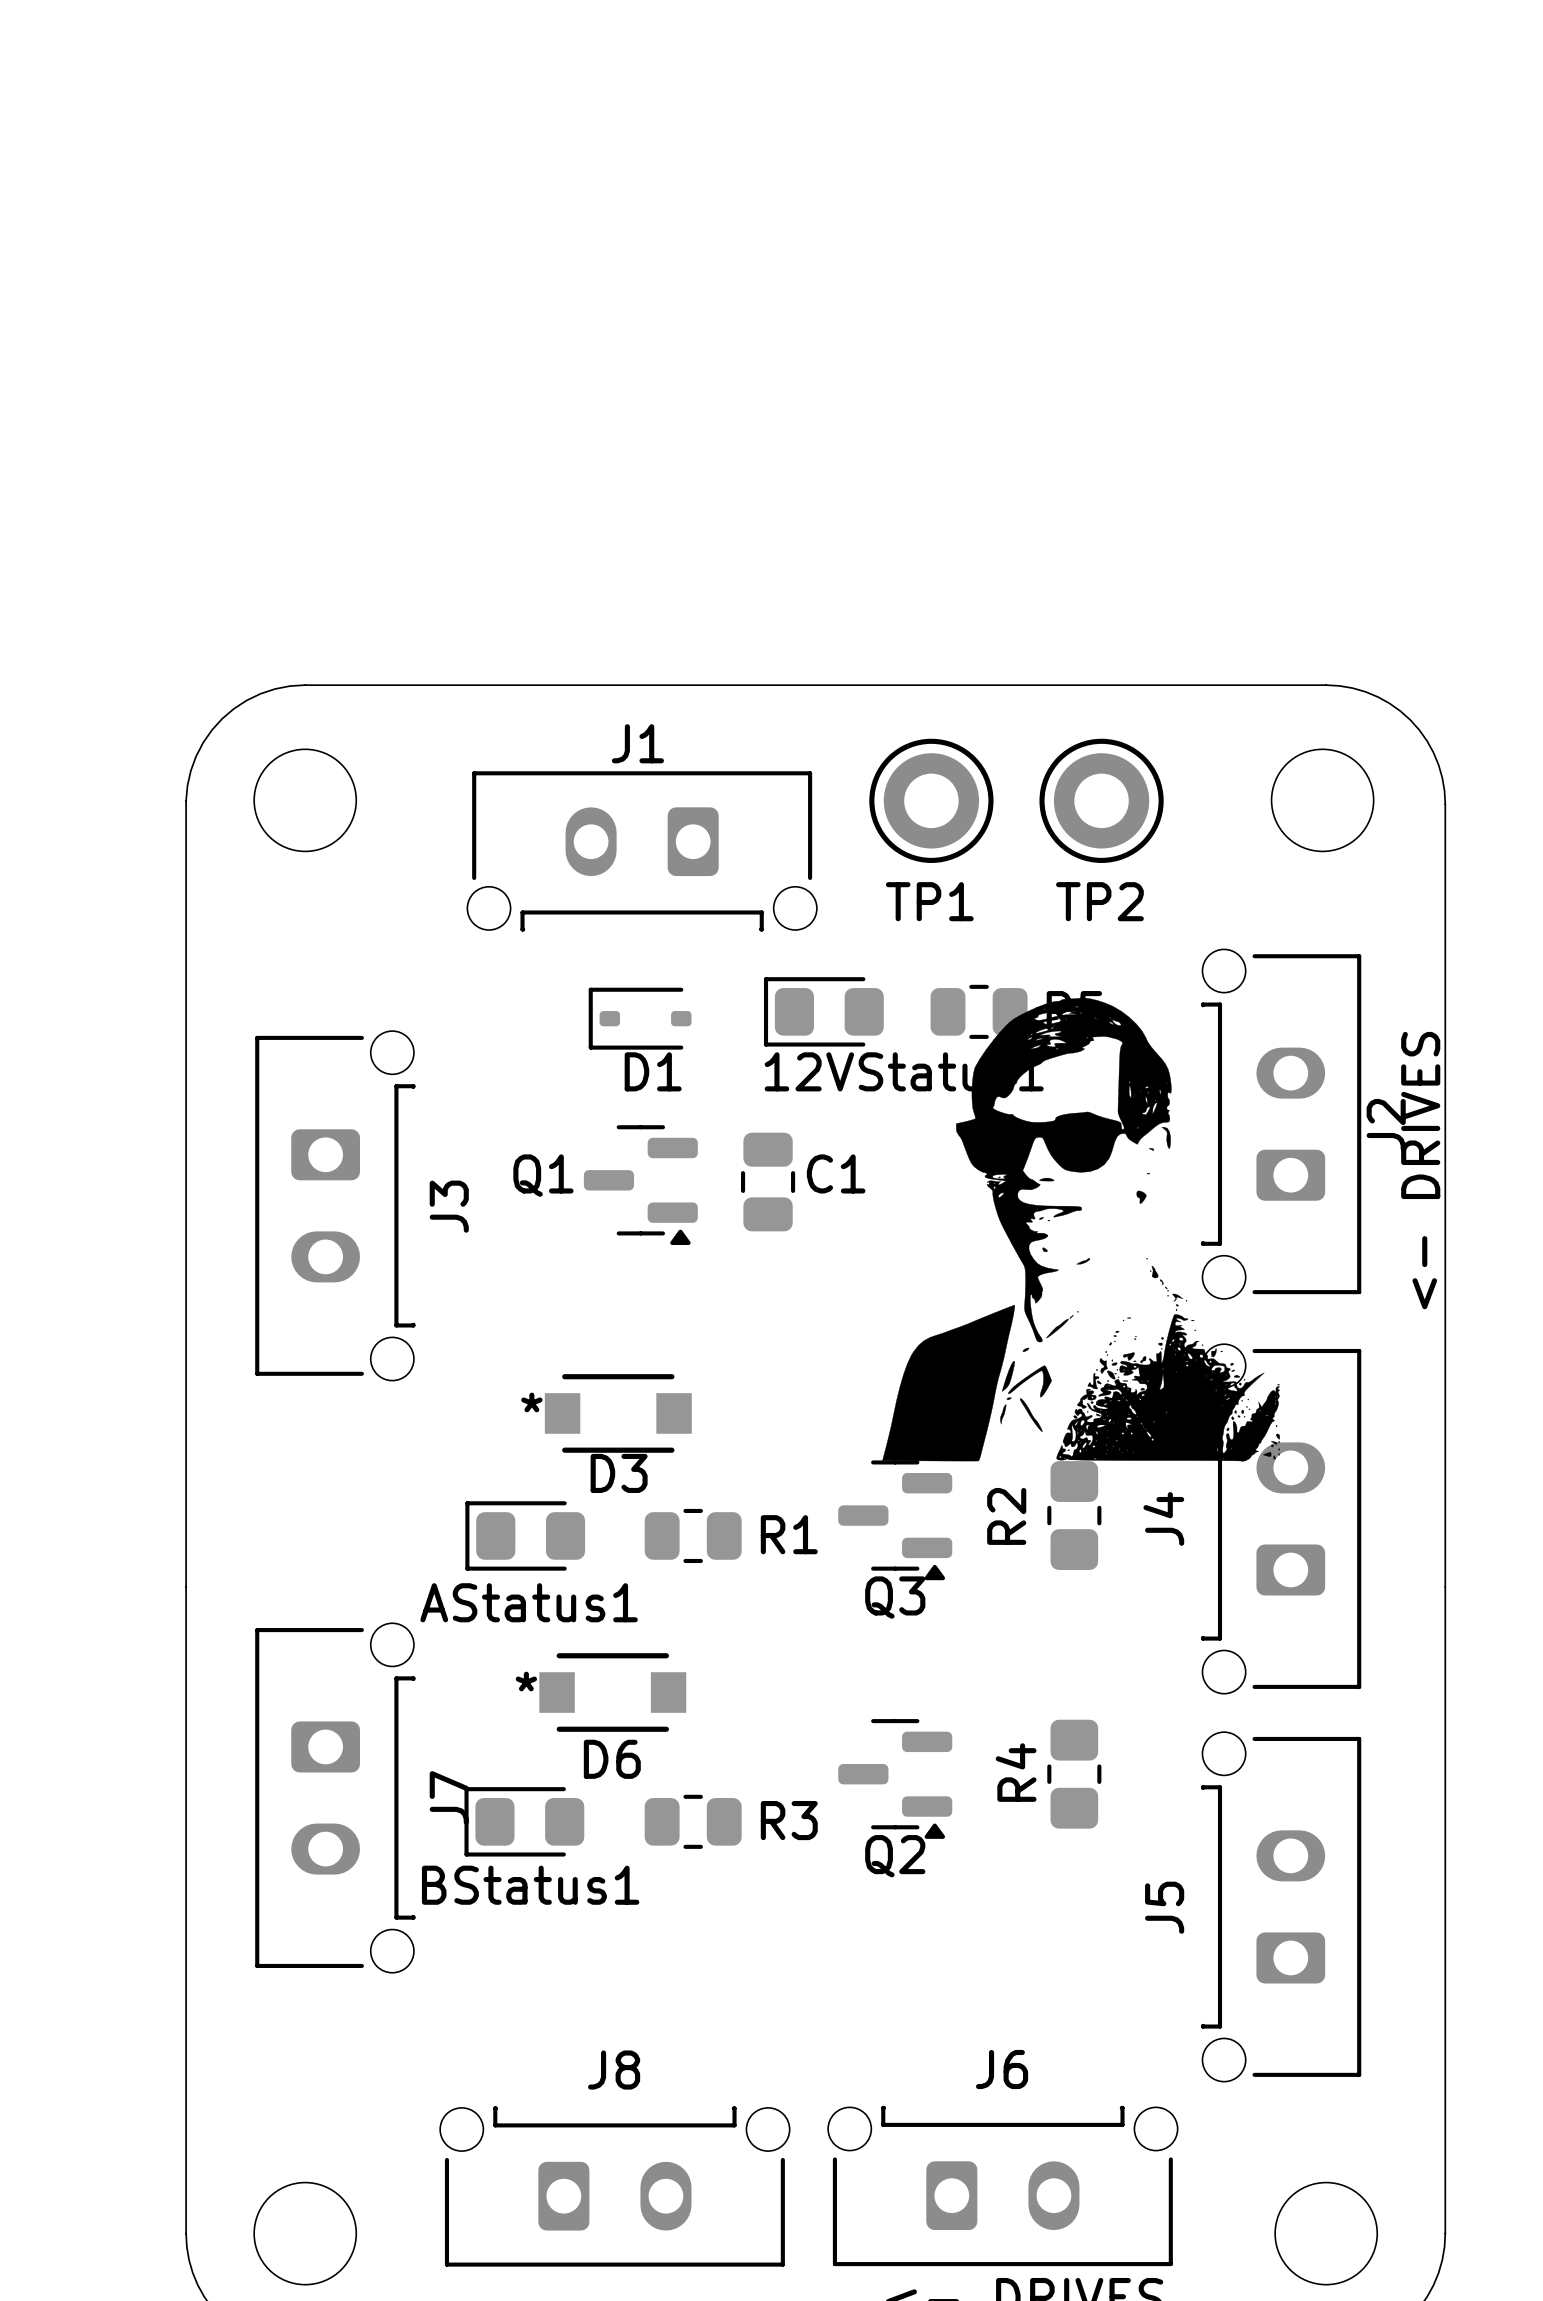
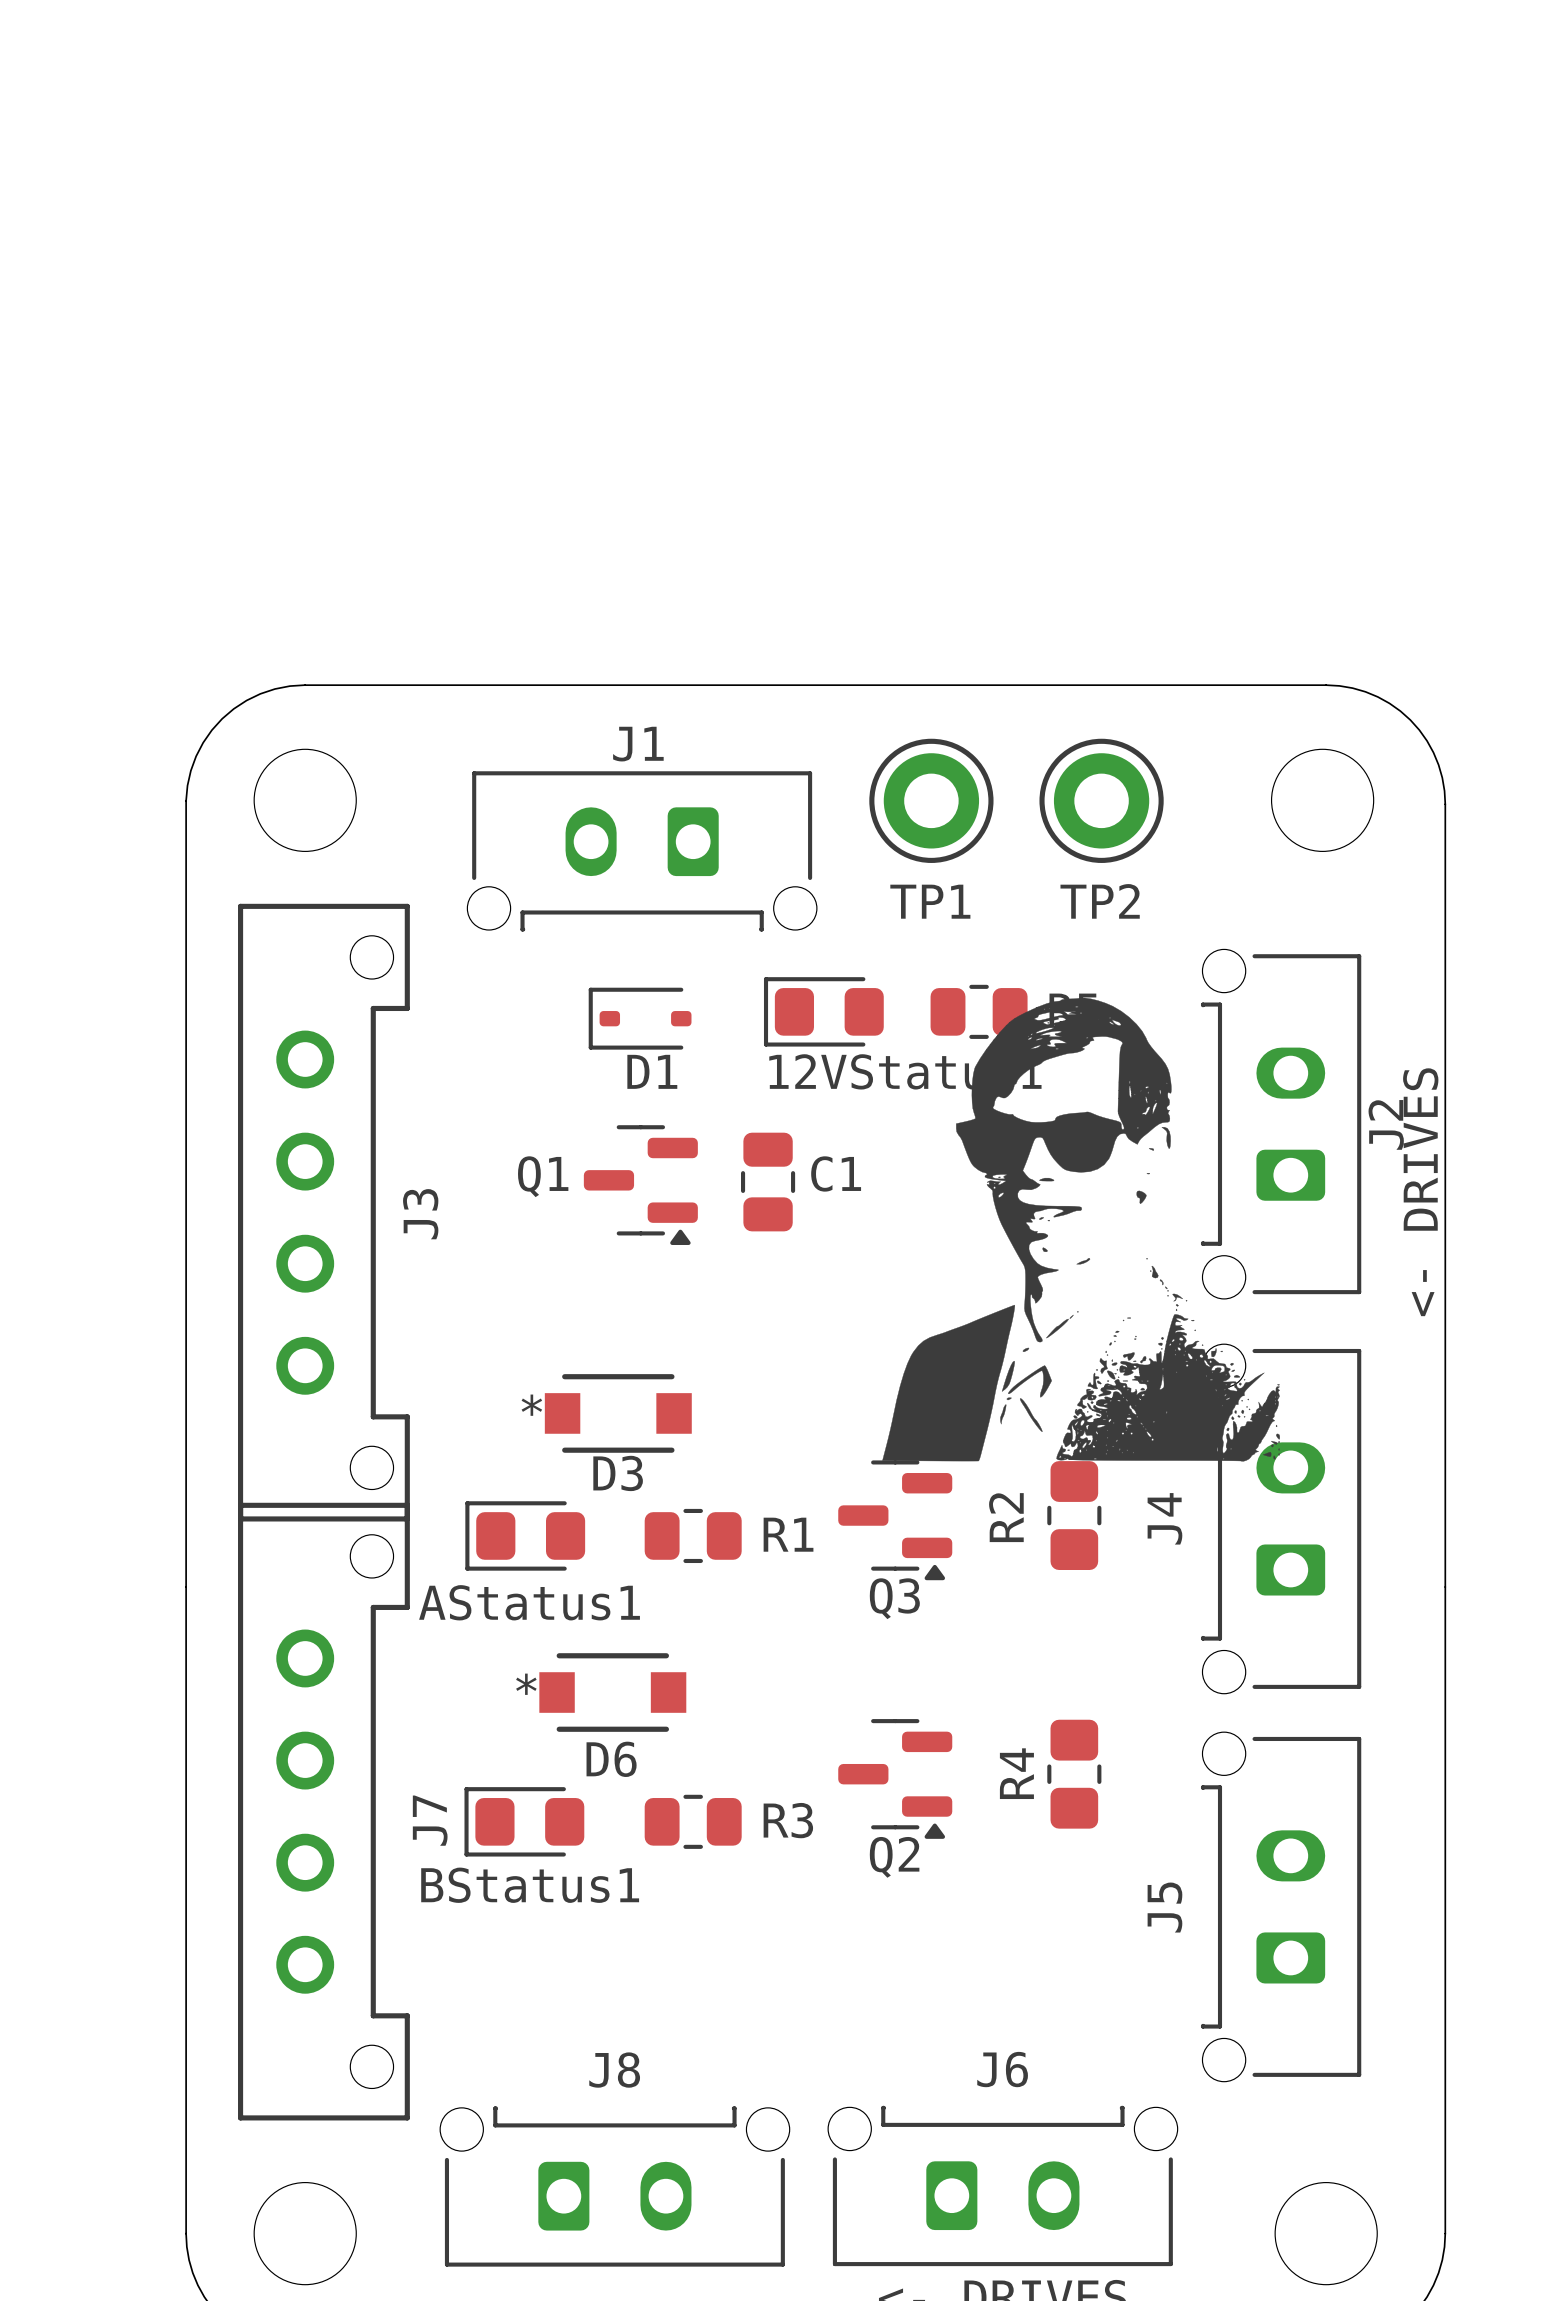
J3 footprint: [255, 1031, 416, 1381] -> [238, 903, 410, 1522]
J7 footprint: [255, 1623, 416, 1973] -> [238, 1502, 410, 2121]

